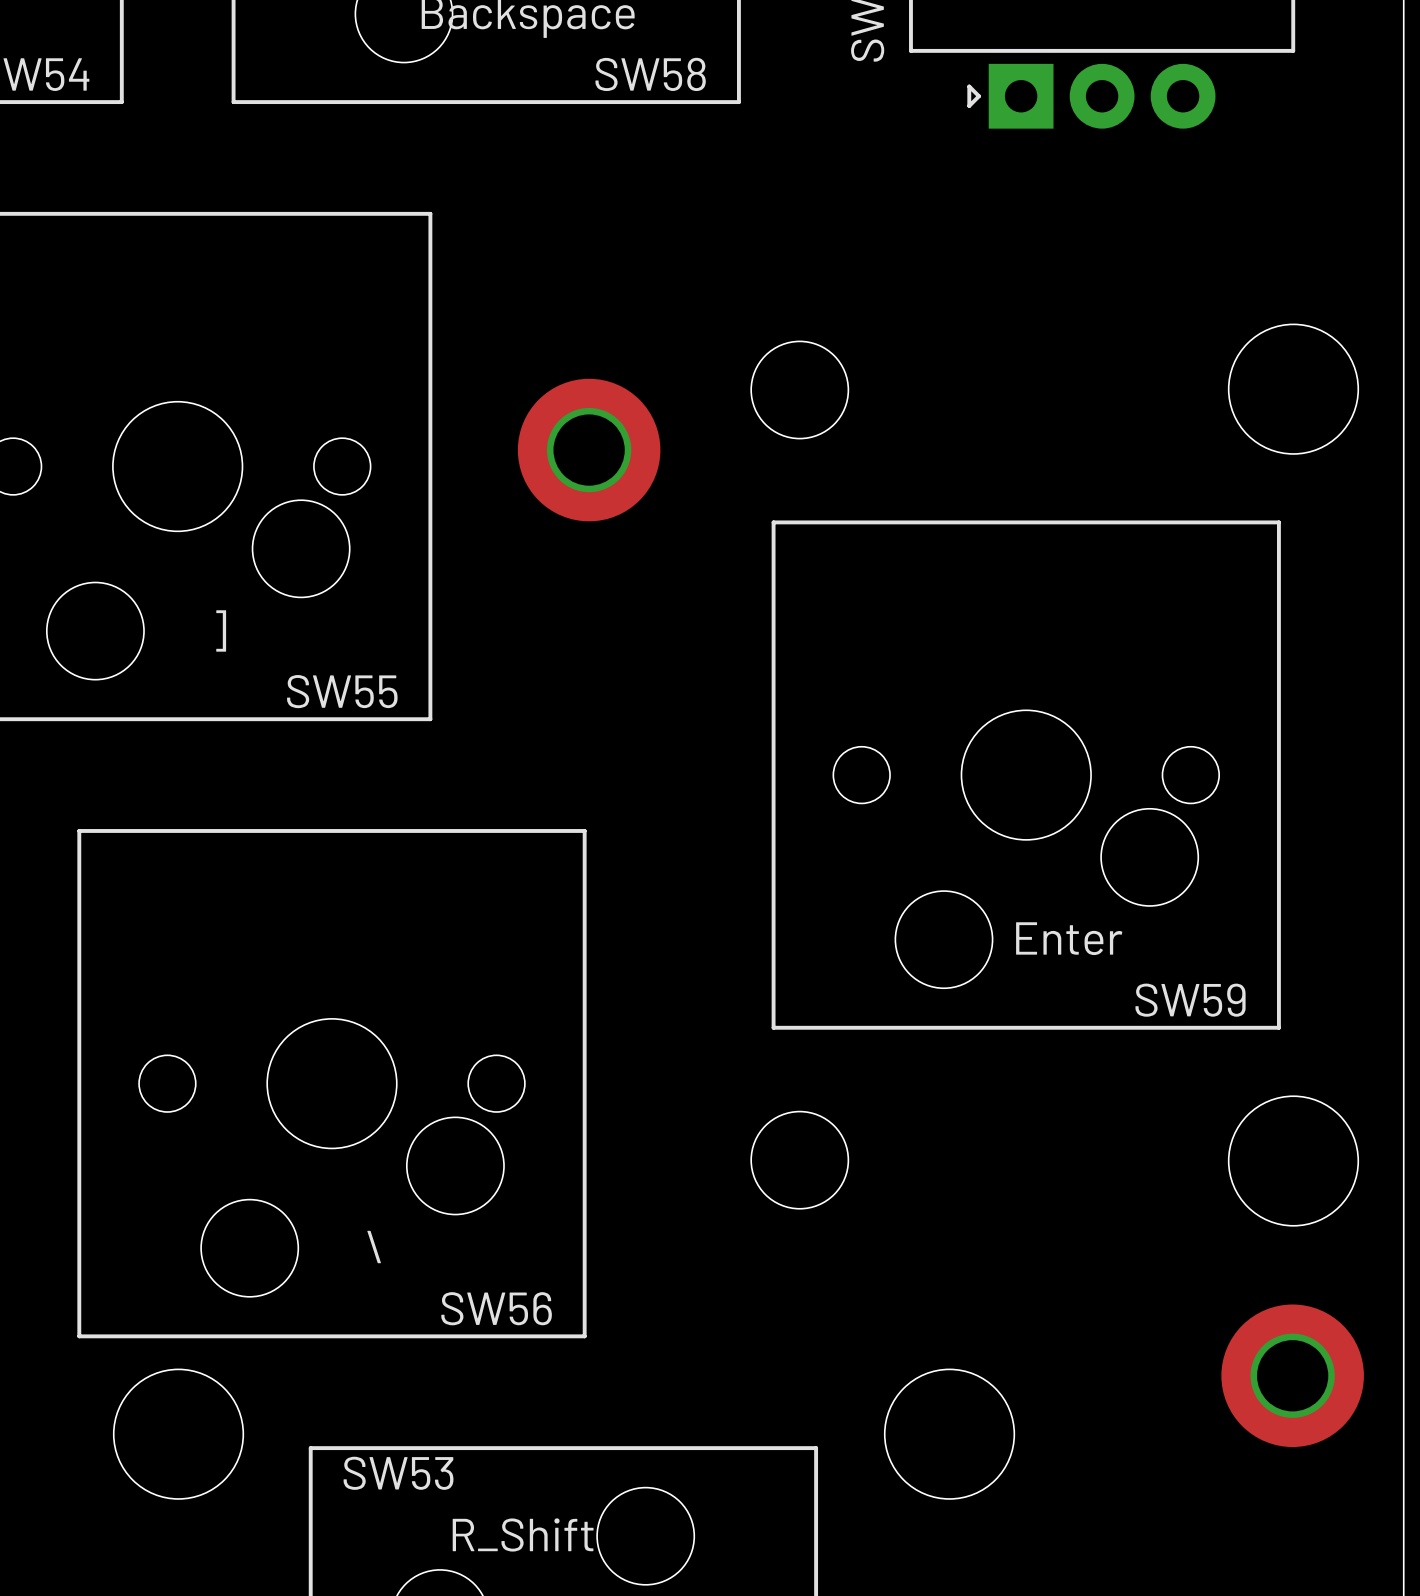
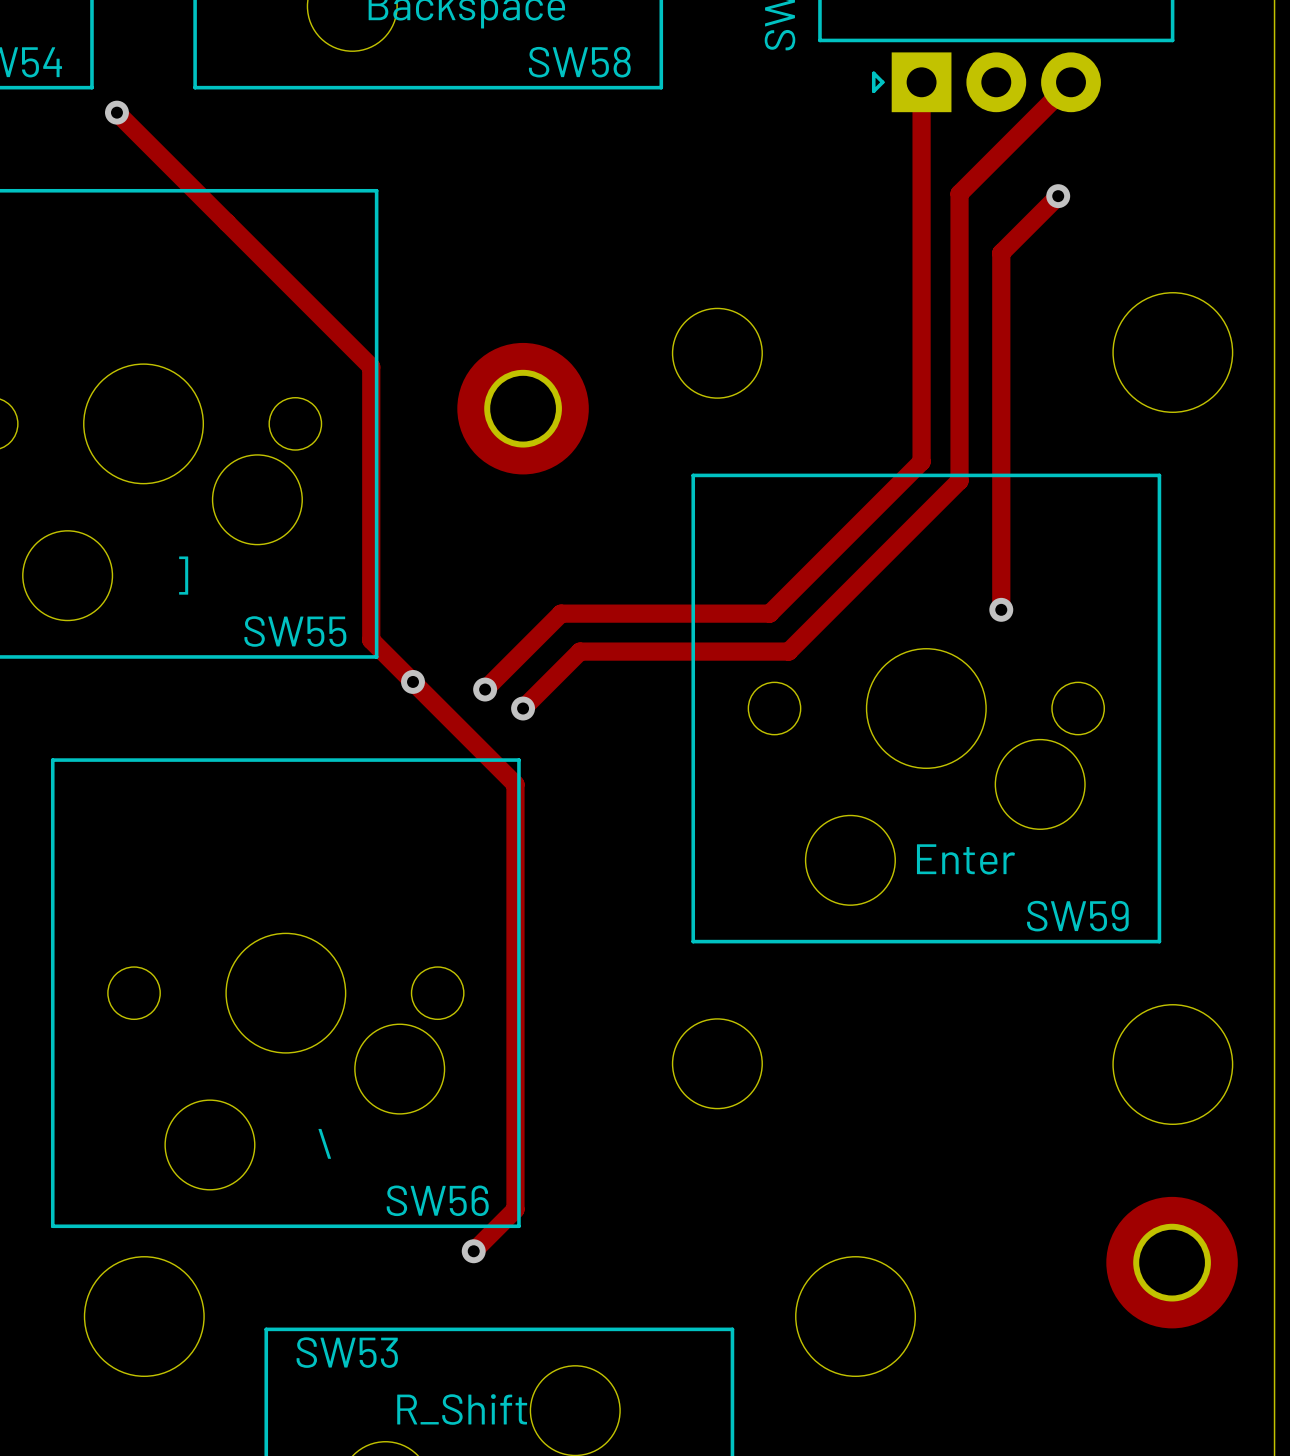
track: none -> (921, 82) (921, 461) (769, 613) (561, 613) (485, 689)
track: none -> (1071, 82) (959, 193) (959, 480) (788, 651) (580, 651) (523, 708)
track: none -> (116, 112) (371, 366) (371, 640) (515, 784) (515, 1209) (473, 1251)
via: none -> (116, 112)
track: none -> (1058, 196) (1001, 253) (1001, 609)
via: none -> (1058, 196)
via: none -> (1001, 609)
via: none -> (413, 681)
via: none -> (485, 689)
via: none -> (523, 708)
via: none -> (473, 1251)

